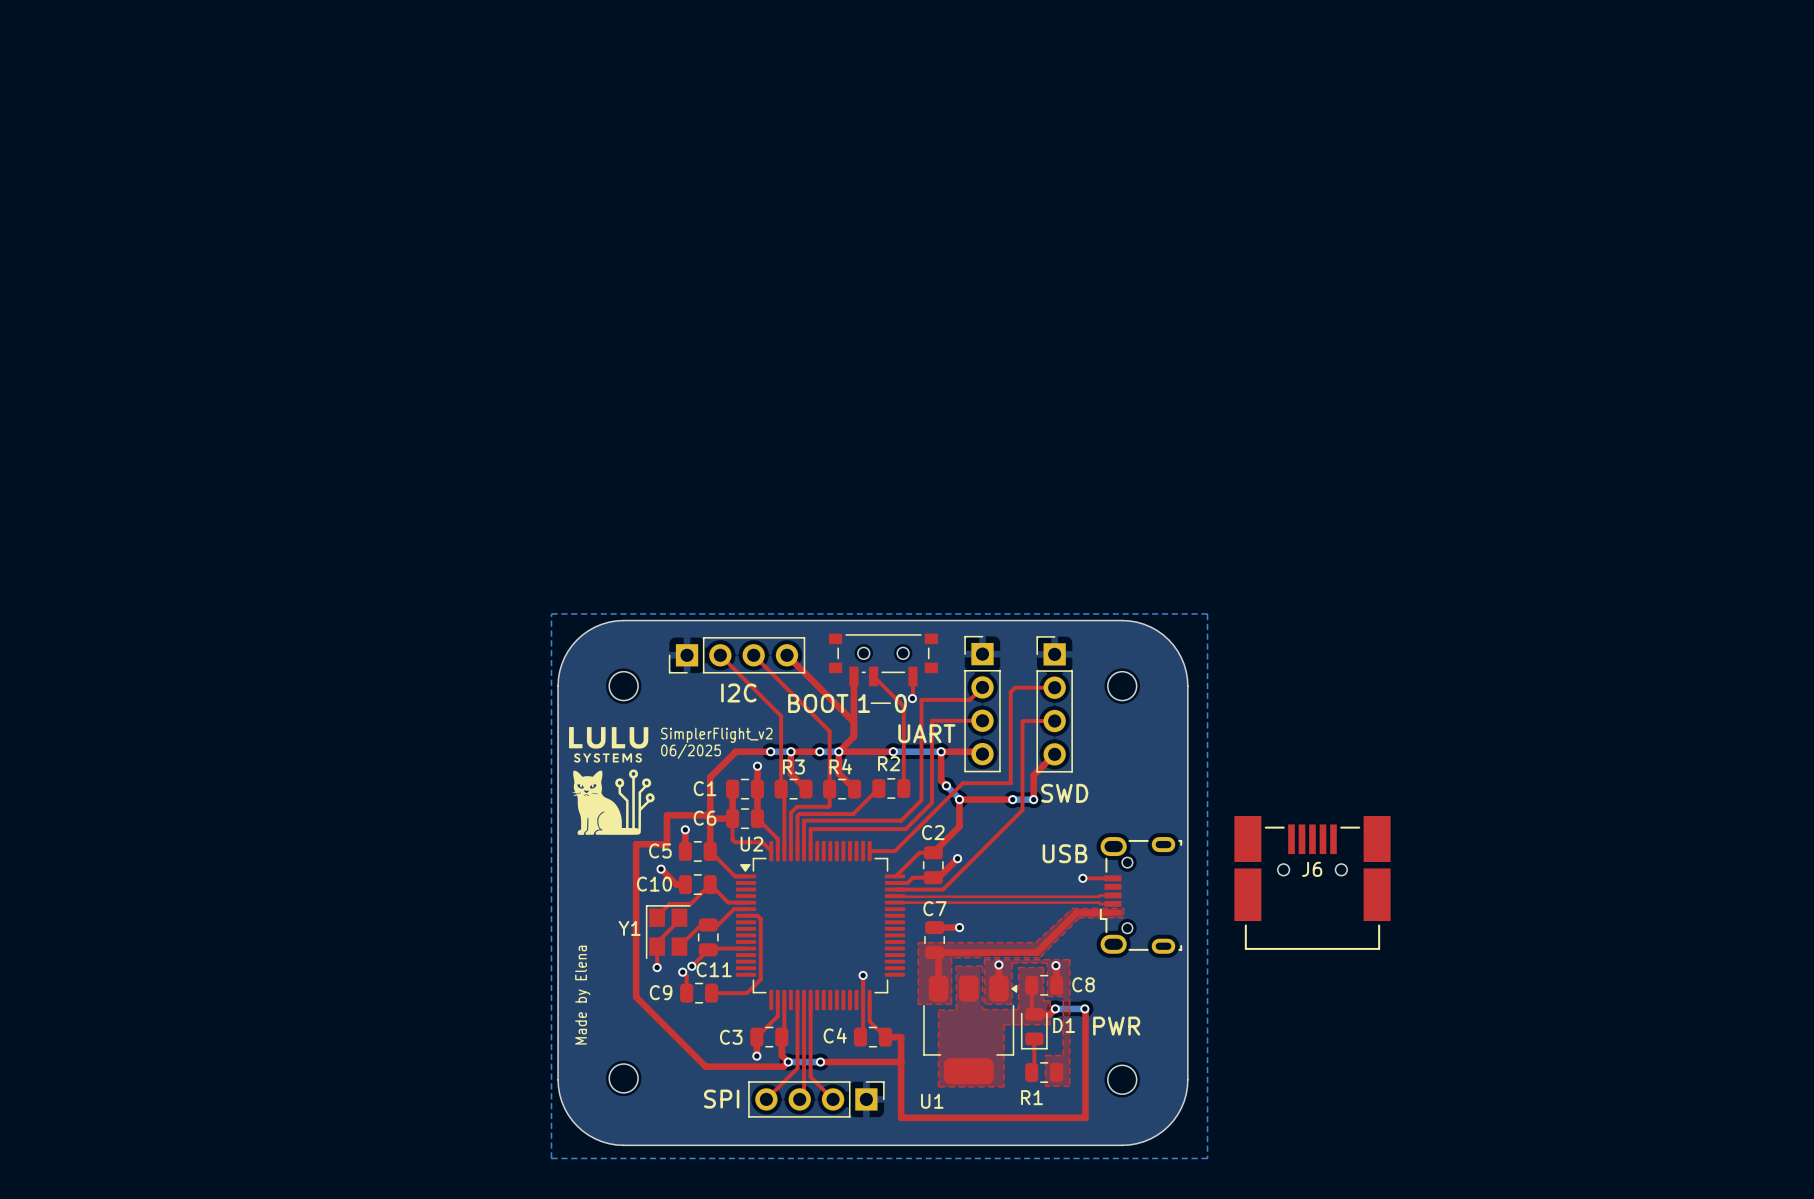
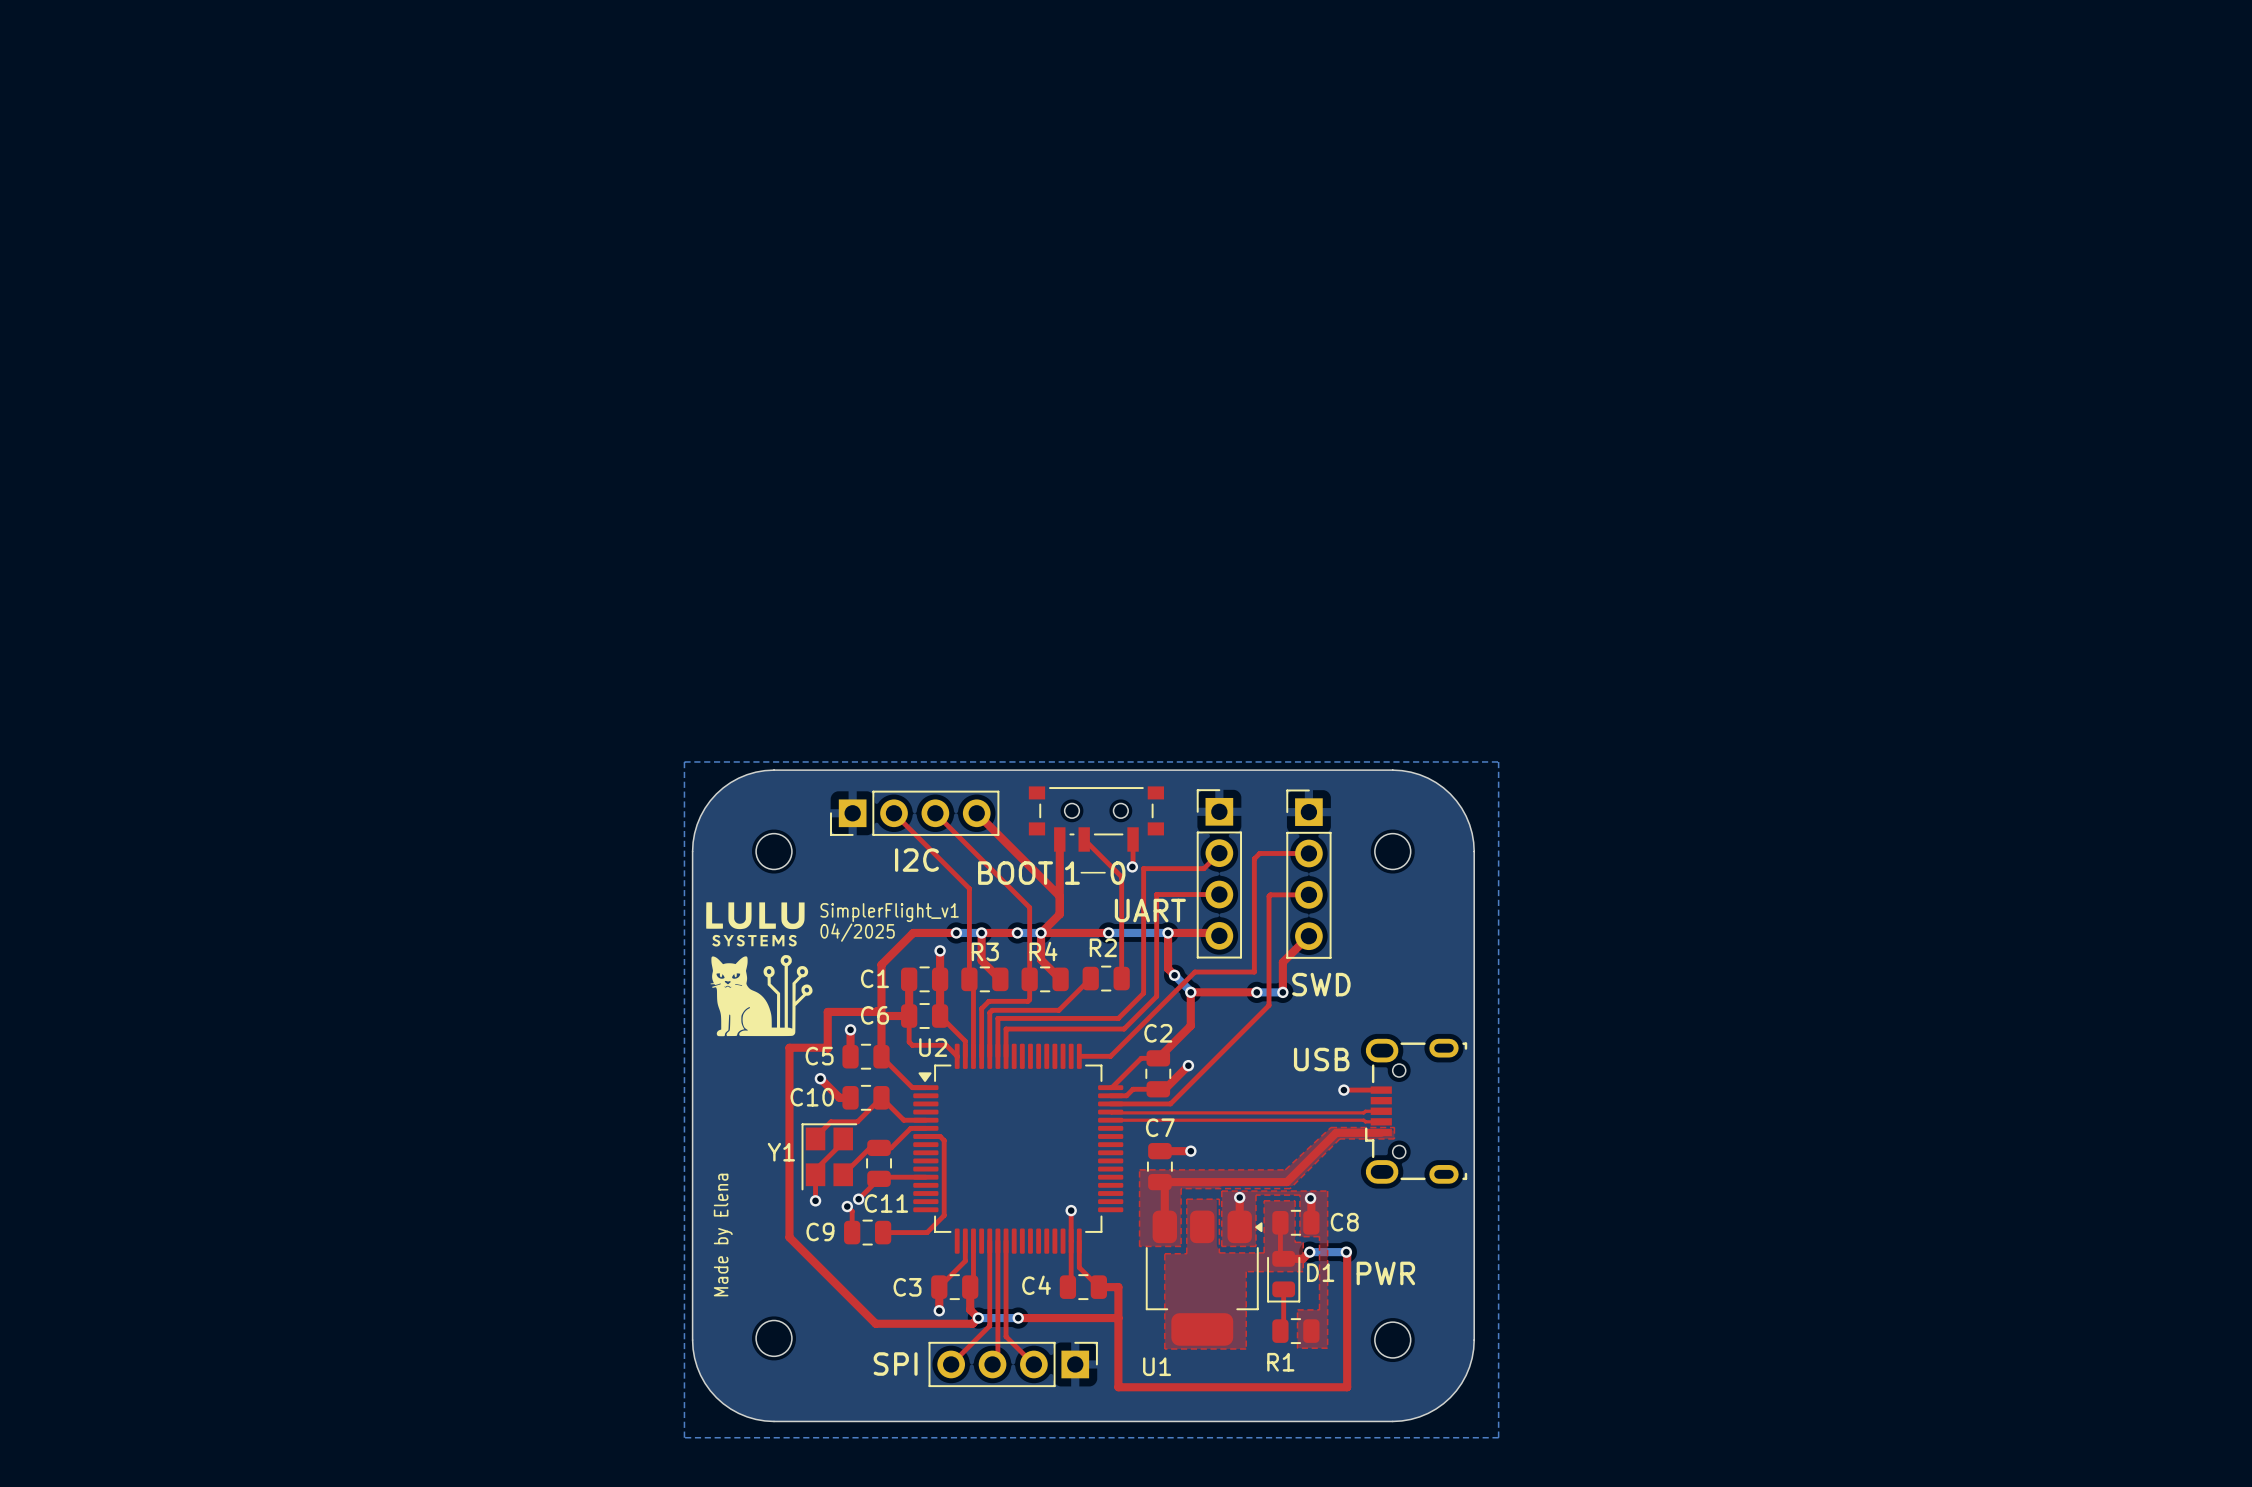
text: SimplerFlight_v2 (716, 735) -> SimplerFlight_v1 (889, 912)
text: 06/2025 (691, 751) -> 04/2025 (857, 932)
J6: (1312, 882) -> none

